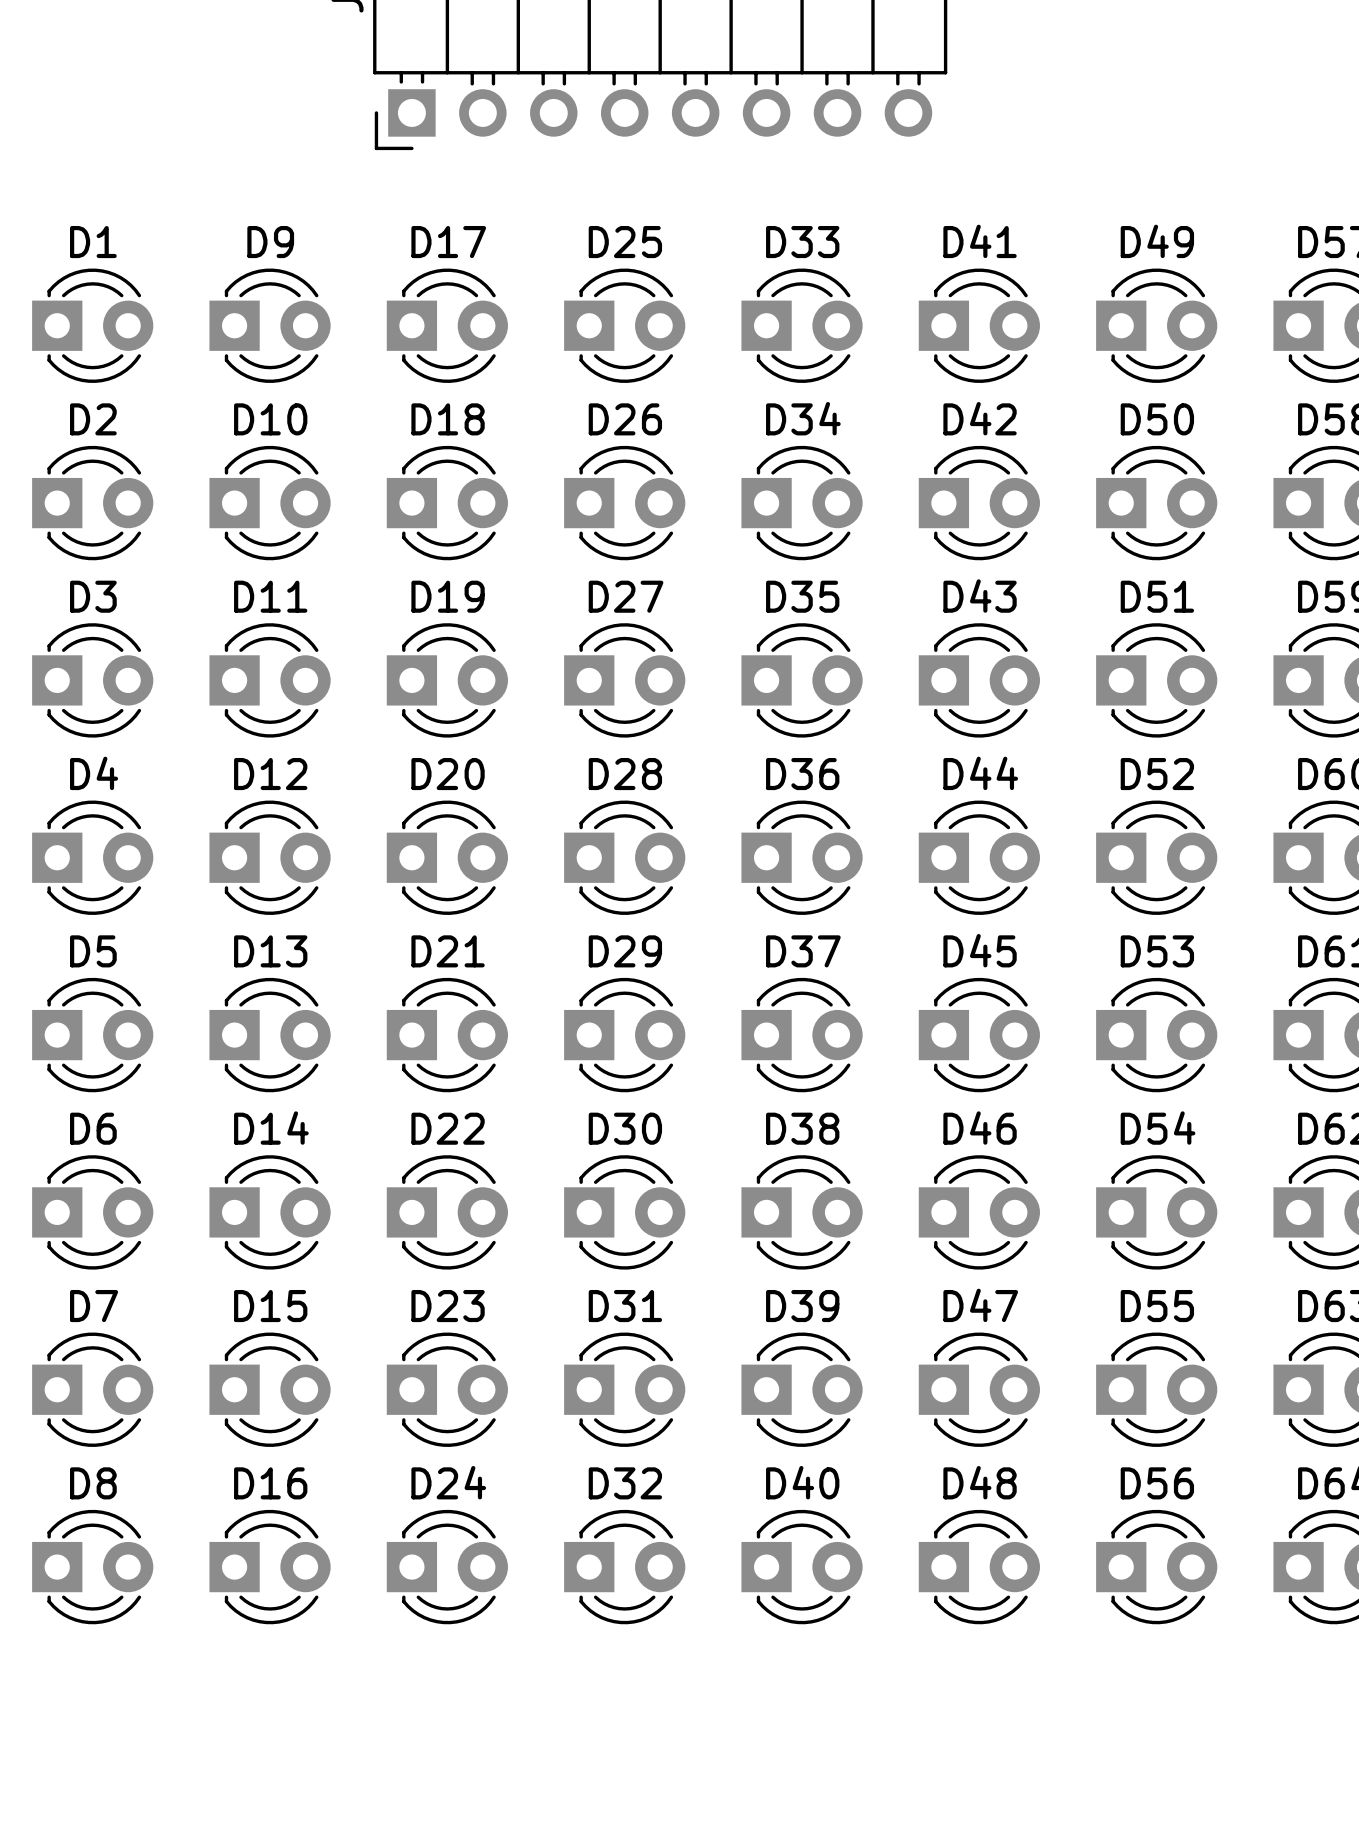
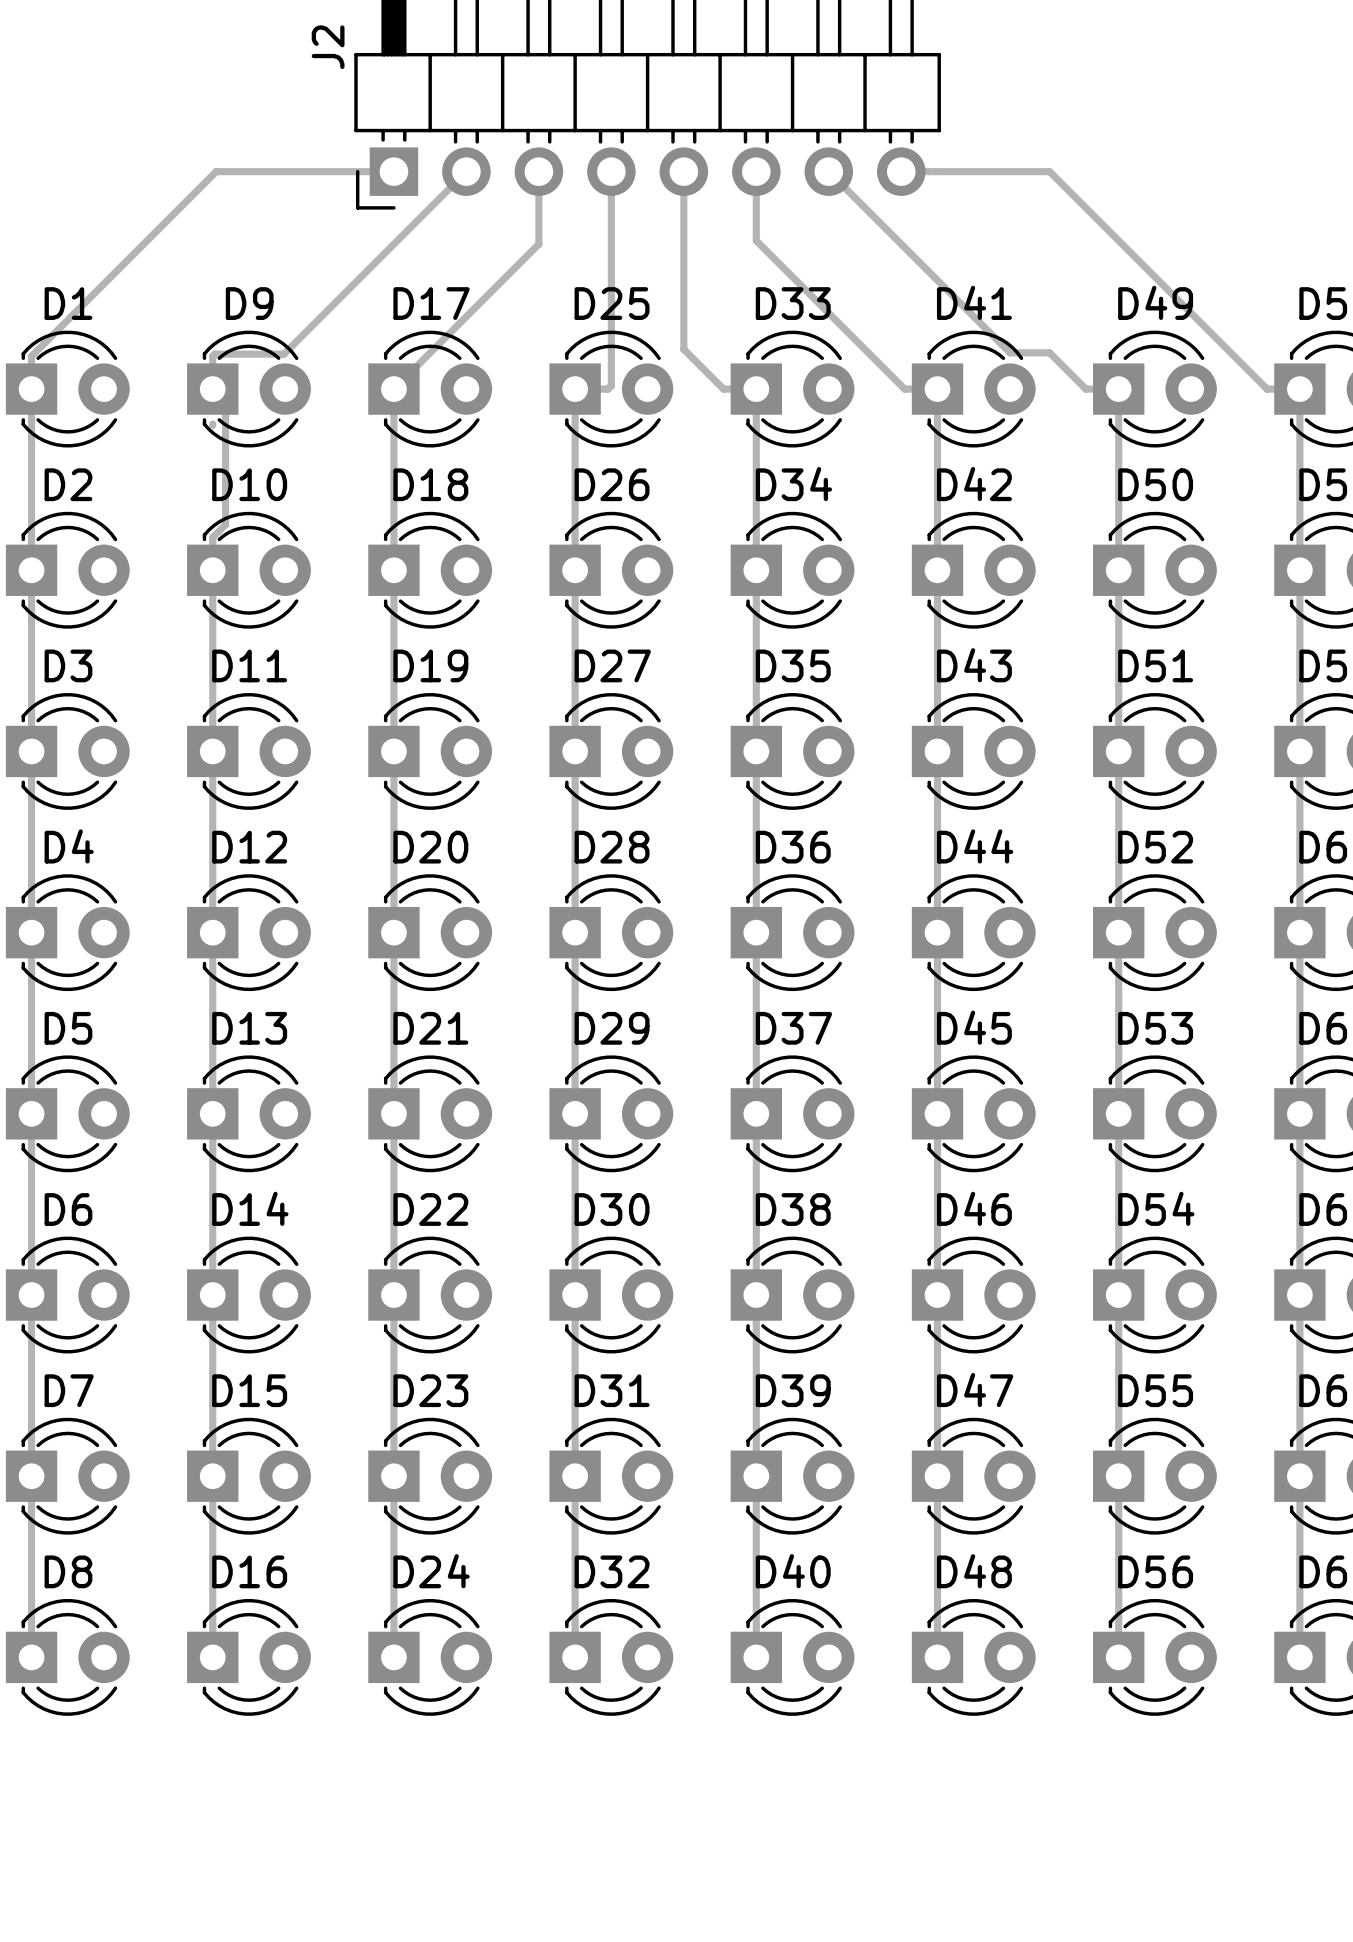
track: none -> (393, 171) (216, 171) (31, 356) (31, 1657)
track: none -> (466, 171) (283, 354) (214, 354) (212, 356) (212, 389) (225, 401) (225, 524) (212, 537) (212, 1657)
track: none -> (538, 171) (538, 244) (393, 389) (393, 1657)
track: none -> (611, 171) (611, 385) (607, 389) (575, 389) (575, 1657)
track: none -> (683, 171) (683, 349) (723, 389) (756, 389) (756, 1657)
track: none -> (756, 171) (756, 240) (904, 389) (937, 389) (937, 1657)
track: none -> (828, 171) (1009, 352) (1049, 352) (1085, 389) (1118, 389) (1118, 1657)
track: none -> (901, 171) (1049, 171) (1267, 389) (1299, 389) (1299, 1657)
track: none -> (212, 424) (212, 425)

